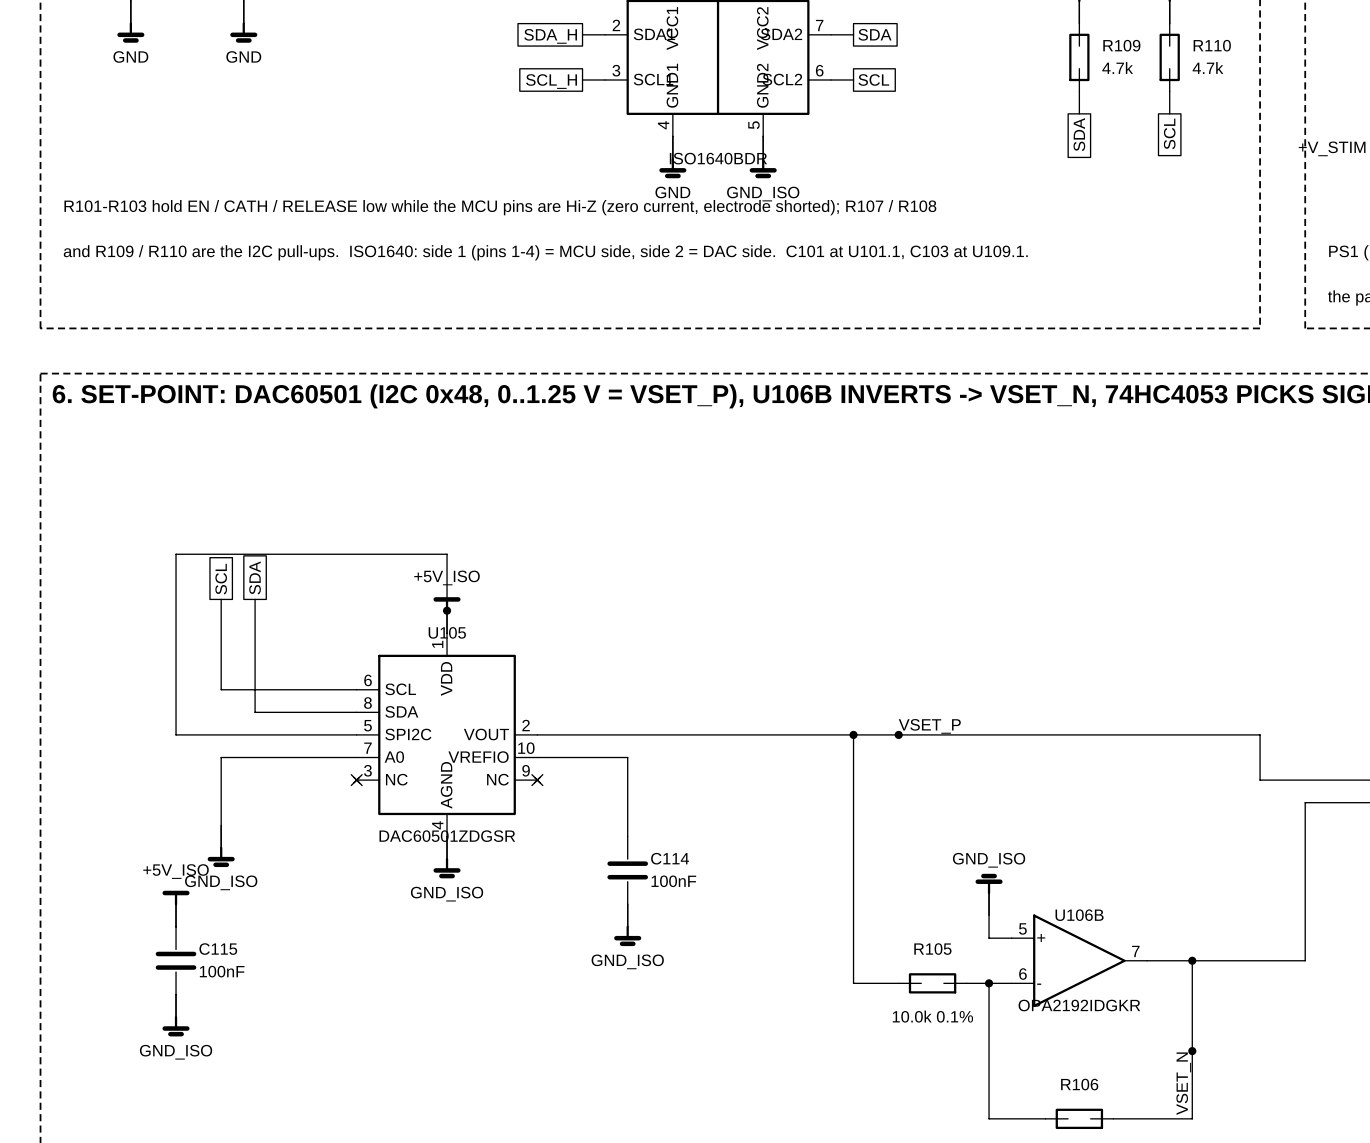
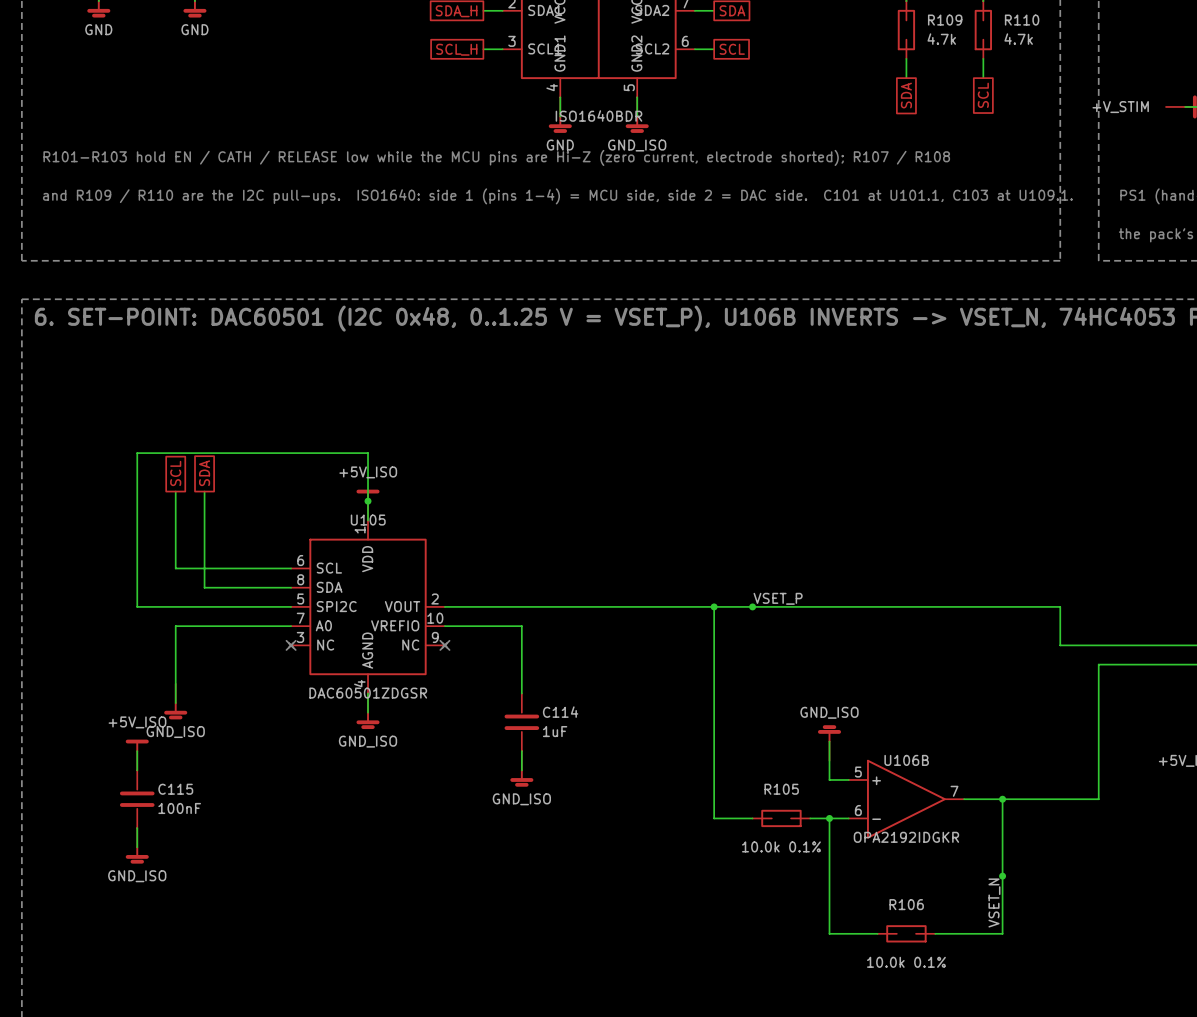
C114 value: 100nF (673, 881) -> 1uF (555, 731)

